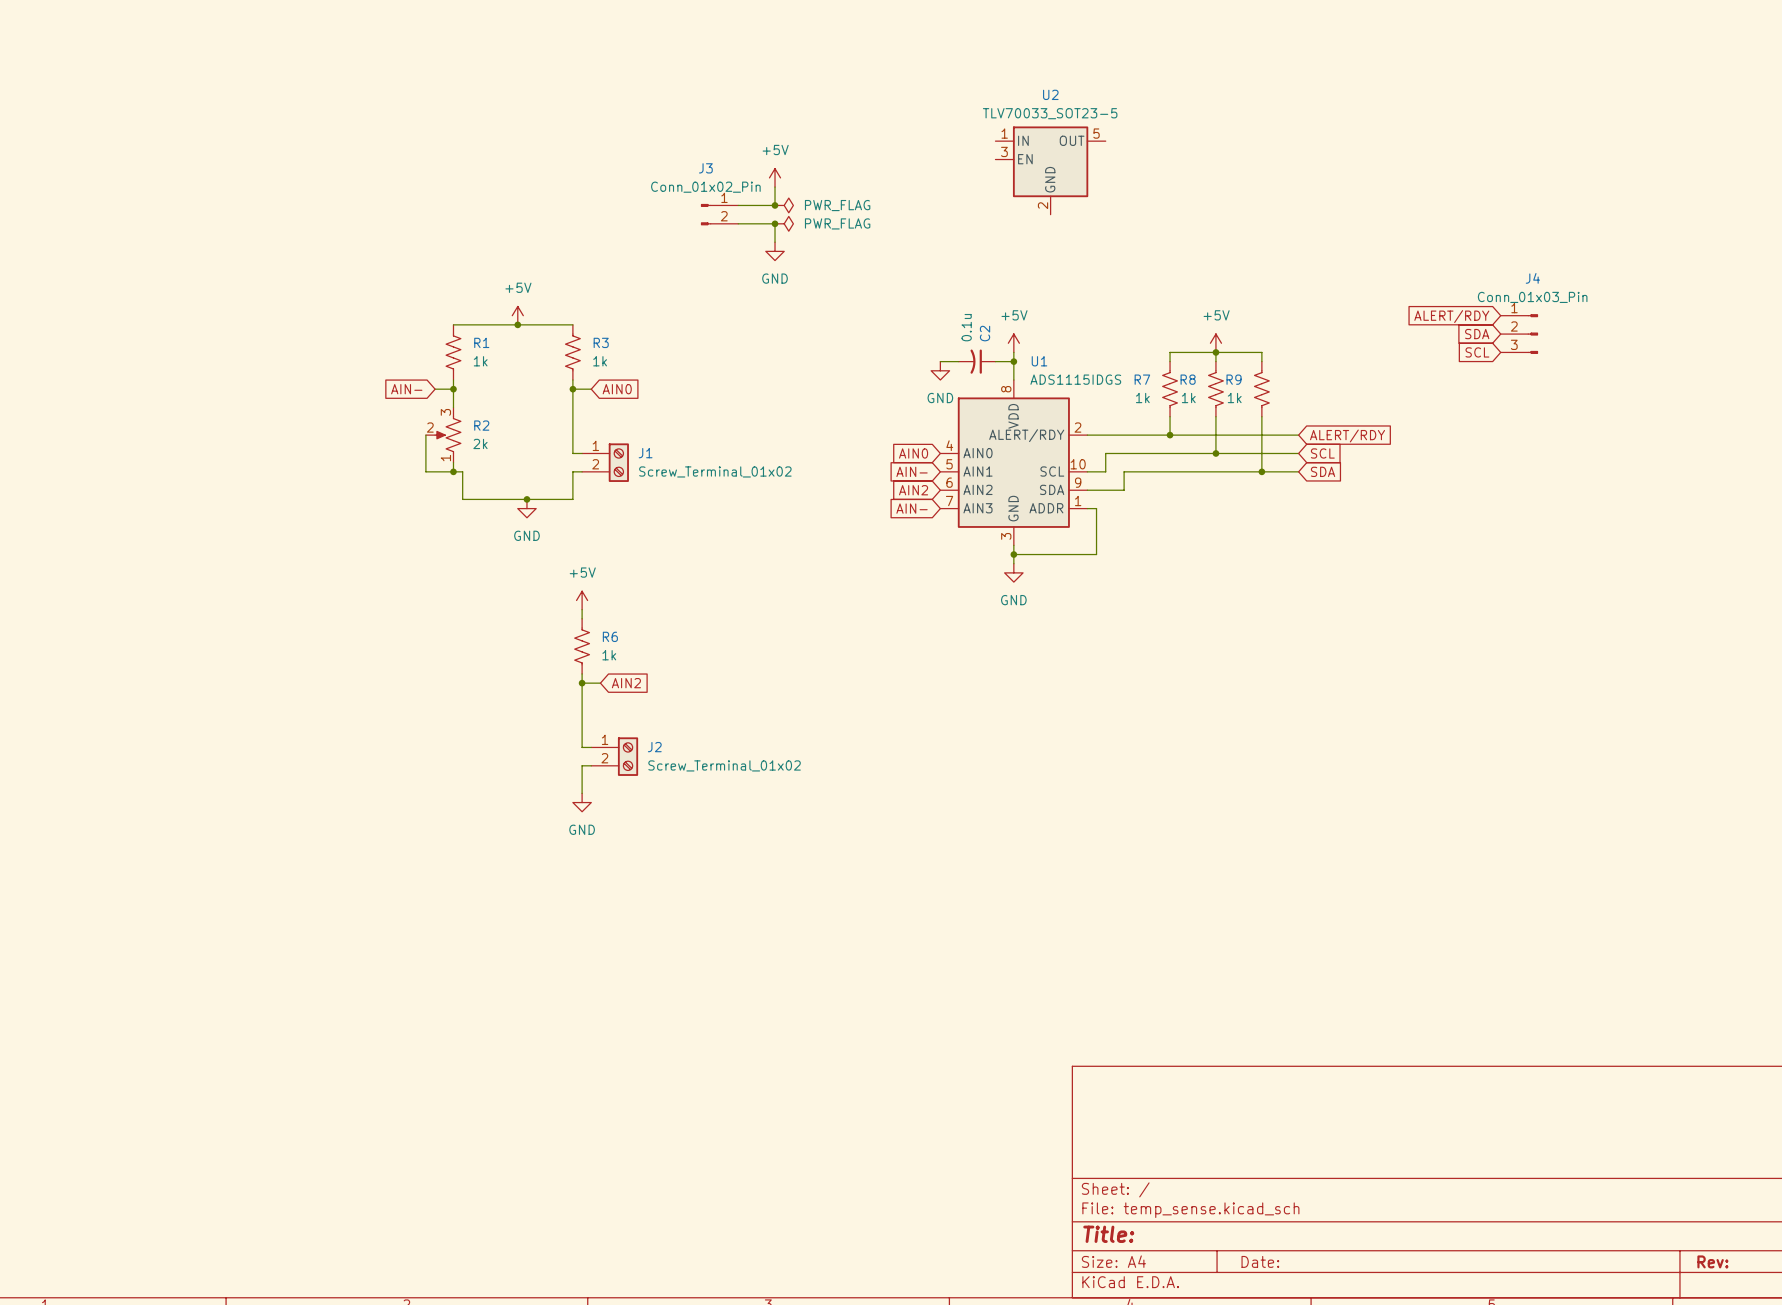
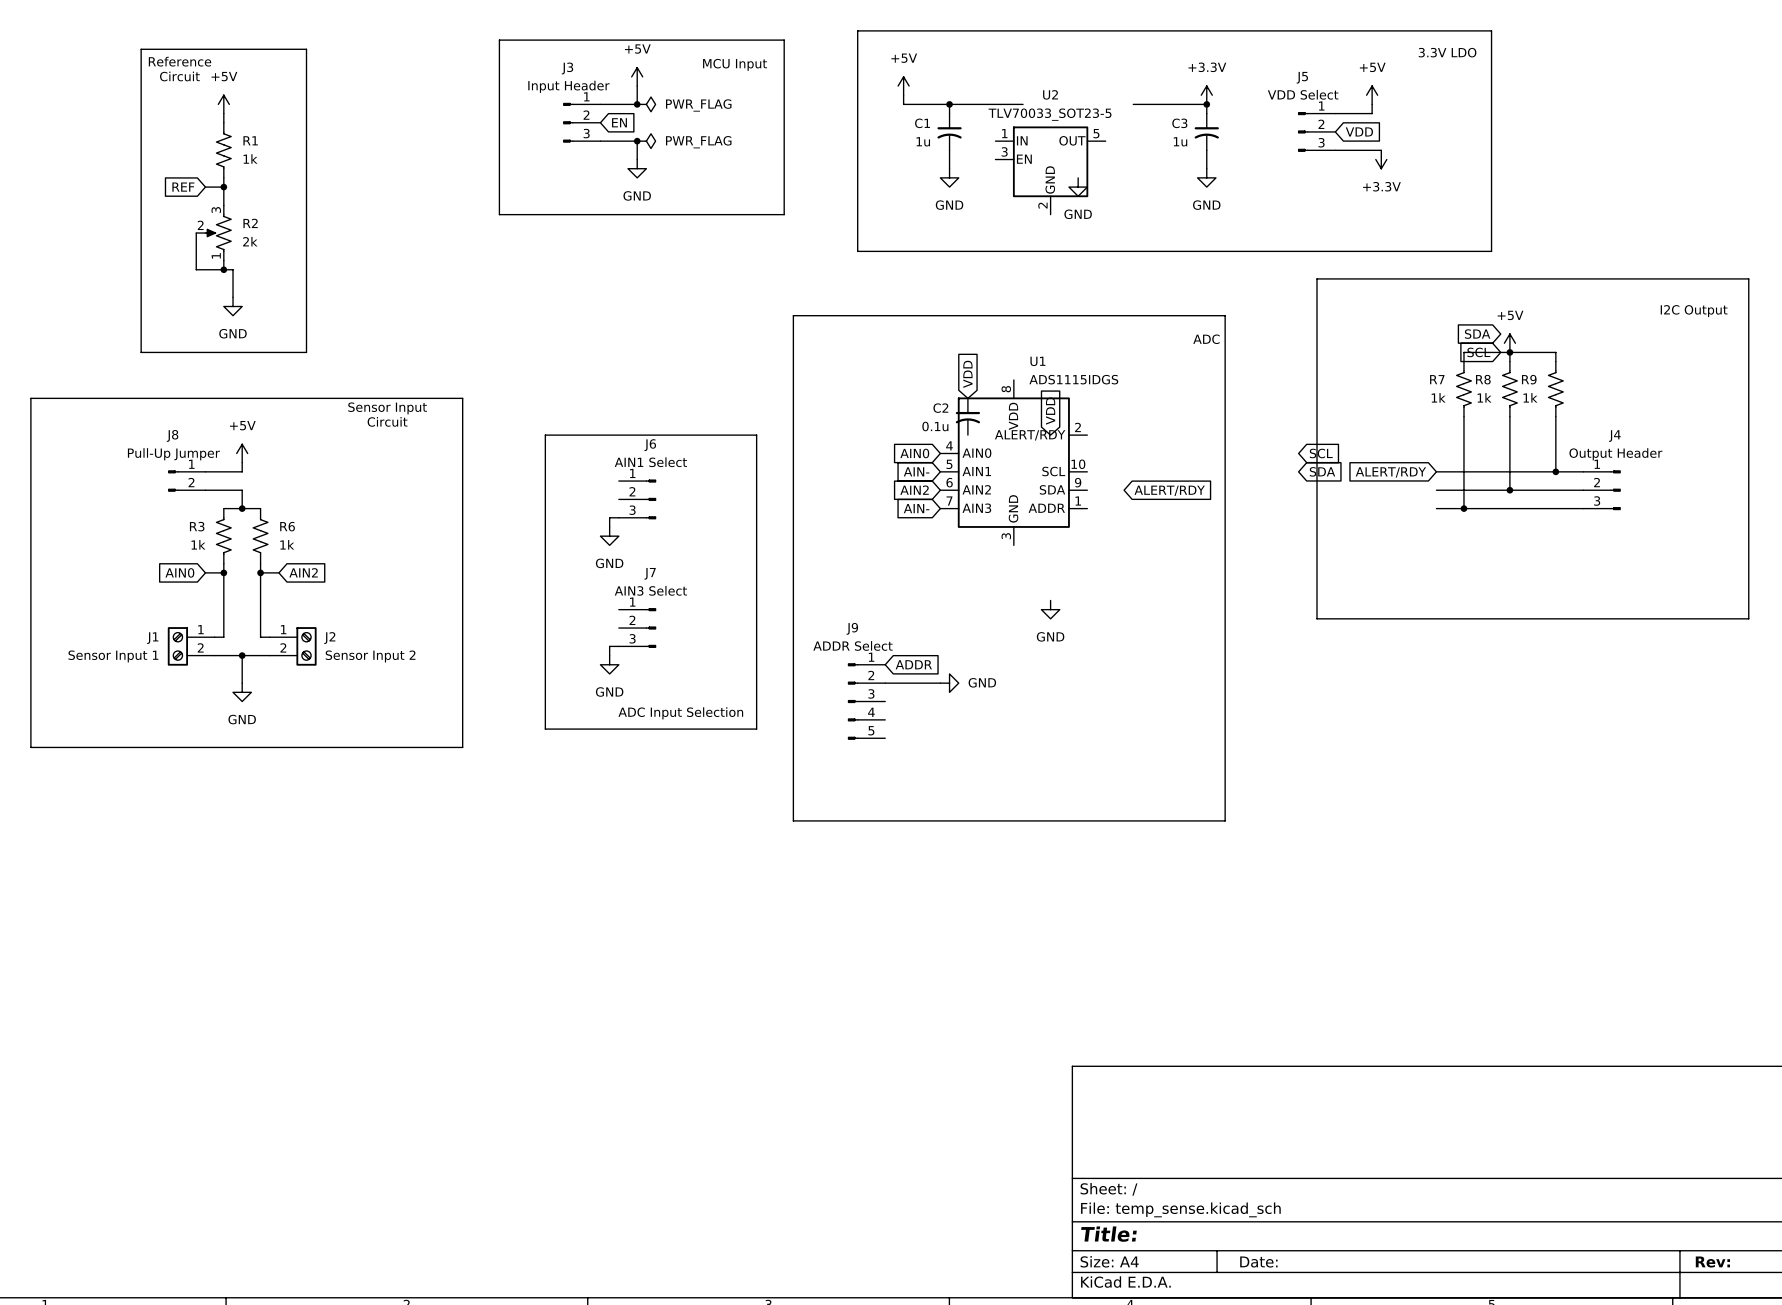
line: none -> (857, 30) (1491, 30) (1491, 251) (857, 251) (857, 30)
line: none -> (499, 40) (784, 40) (784, 214) (499, 214) (499, 40)
line: none -> (141, 49) (306, 49) (306, 352) (141, 352) (141, 49)
text: none -> 3.3V LDO (1447, 52)
text: none -> Reference (180, 61)
text: none -> MCU Input (735, 64)
text: none -> Circuit (179, 76)
power symbol: none -> +5V (637, 76)
power symbol: none -> +5V (903, 86)
wire: none -> (903, 95) (903, 104) (1023, 104)
power symbol: none -> +3.3V (1206, 95)
power symbol: none -> +5V (1372, 95)
power symbol: none -> +5V (223, 104)
junction: none -> (637, 104)
power symbol: none -> PWR_FLAG (646, 104)
wire: none -> (949, 104) (949, 113)
junction: none -> (949, 104)
wire: none -> (1133, 104) (1206, 104) (1206, 113)
junction: none -> (1206, 104)
wire: none -> (1372, 104) (1372, 113) (1335, 113)
wire: none -> (223, 113) (223, 122)
global label: none -> EN (619, 122)
C1: none -> 1u (949, 131)
C3: none -> 1u (1206, 131)
J5: none -> VDD Select (1316, 131)
global label: none -> VDD (1359, 131)
junction: none -> (637, 141)
power symbol: none -> PWR_FLAG (646, 141)
wire: none -> (949, 150) (949, 168)
wire: none -> (1206, 150) (1206, 168)
wire: none -> (1335, 150) (1381, 150)
power symbol: none -> +3.3V (1381, 159)
power symbol: none -> GND (637, 168)
wire: none -> (223, 177) (223, 205)
power symbol: +5V (775, 177) -> none
power symbol: none -> GND (949, 177)
power symbol: none -> GND (1206, 177)
global label: none -> REF (183, 187)
wire: none -> (205, 187) (223, 187)
junction: none -> (223, 187)
J3 value: Conn_01x02_Pin (705, 187) -> Input Header (568, 86)
wire: (775, 187) (775, 205) (738, 205) -> (637, 86) (637, 104) (600, 104)
power symbol: none -> GND (1078, 187)
J3 symbol: [700, 203, 739, 226] -> [563, 102, 601, 143]
junction: (775, 205) -> none
power symbol: PWR_FLAG (784, 205) -> none
wire: (738, 223) (775, 223) (775, 242) -> (600, 141) (637, 141) (637, 159)
junction: (775, 223) -> none
power symbol: PWR_FLAG (784, 223) -> none
wire: none -> (196, 233) (196, 269) (233, 269) (233, 297)
power symbol: GND (775, 251) -> none
wire: none -> (223, 260) (223, 269)
junction: none -> (223, 269)
line: none -> (1317, 278) (1748, 278) (1748, 618) (1317, 618) (1317, 278)
J4 value: Conn_01x03_Pin (1532, 297) -> Output Header (1615, 454)
power symbol: none -> GND (233, 306)
text: none -> I2C Output (1694, 311)
power symbol: +5V (517, 315) -> none
line: none -> (793, 315) (1225, 315) (1225, 820) (793, 820) (793, 315)
global label: ALERT/RDY (1451, 316) -> none
wire: (453, 324) (572, 324) -> none
junction: (517, 324) -> none
J4 position: (1519, 334) -> (1602, 490)
text: none -> ADC (1206, 339)
power symbol: +5V (1013, 343) -> none
power symbol: +5V (1215, 343) -> none
power symbol: none -> +5V (1509, 343)
R1 position: (453, 352) -> (223, 150)
R3 flip: as is (572, 352) -> left-right (223, 536)
R3 position: (572, 352) -> (223, 536)
wire: (1013, 352) (1013, 379) -> none
wire: (1215, 352) (1215, 361) -> none
junction: (1215, 352) -> none
wire: none -> (1509, 352) (1509, 361)
junction: none -> (1509, 352)
wire: (940, 361) (958, 361) -> none
C2 rotation: 0° (976, 361) -> 90° counterclockwise (967, 417)
C2 position: (977, 361) -> (967, 416)
wire: (995, 361) (1013, 361) -> none
junction: (1013, 361) -> none
wire: (1170, 361) (1170, 352) (1261, 352) (1261, 361) -> none
wire: none -> (1463, 361) (1463, 352) (1555, 352) (1555, 361)
power symbol: GND (940, 370) -> none
global label: none -> VDD (967, 374)
wire: (453, 379) (453, 407) -> none
wire: (572, 379) (572, 453) (582, 453) -> none
global label: AIN- (406, 389) -> none
wire: (435, 389) (453, 389) -> none
junction: (453, 389) -> none
wire: (572, 389) (591, 389) -> none
junction: (572, 389) -> none
global label: AIN0 (617, 389) -> none
R7 position: (1170, 389) -> (1463, 389)
R8 position: (1215, 389) -> (1509, 389)
R9 position: (1261, 389) -> (1555, 389)
line: none -> (30, 398) (462, 398) (462, 747) (30, 747) (30, 398)
text: none -> Sensor Input (387, 408)
global label: none -> VDD (1050, 411)
wire: (1170, 416) (1170, 435) -> none
wire: (1215, 416) (1215, 453) -> none
wire: (1261, 416) (1261, 471) -> none
wire: none -> (1463, 416) (1463, 508)
wire: none -> (1509, 416) (1509, 490)
wire: none -> (1555, 416) (1555, 471)
text: none -> Circuit (387, 421)
wire: (425, 435) (425, 471) (462, 471) (462, 499) (572, 499) (572, 471) (582, 471) -> none
R2 position: (443, 435) -> (213, 233)
line: none -> (545, 435) (756, 435) (756, 729) (545, 729) (545, 435)
wire: (1087, 435) (1298, 435) -> none
junction: (1170, 435) -> none
global label: ALERT/RDY (1347, 435) -> none
power symbol: none -> +5V (242, 453)
junction: (1215, 453) -> none
wire: (1298, 453) (1105, 453) (1105, 471) (1087, 471) -> none
wire: none -> (242, 462) (242, 471) (205, 471)
wire: (453, 462) (453, 471) -> none
J1 position: (605, 462) -> (191, 646)
J1 flip: as is (618, 462) -> left-right (177, 646)
junction: (453, 471) -> none
J1 value: Screw_Terminal_01x02 (715, 471) -> Sensor Input 1 (113, 656)
junction: (1261, 471) -> none
wire: (1298, 471) (1124, 471) (1124, 490) (1087, 490) -> none
wire: none -> (1436, 471) (1583, 471)
junction: none -> (1555, 471)
global label: none -> ALERT/RDY (1390, 472)
J8: none -> Pull-Up Jumper (186, 481)
wire: none -> (205, 490) (242, 490) (242, 508)
wire: none -> (1436, 490) (1583, 490)
junction: none -> (1509, 490)
global label: none -> ALERT/RDY (1169, 490)
junction: (526, 499) -> none
J6: none -> AIN1 Select (637, 499)
wire: none -> (223, 508) (260, 508)
junction: none -> (242, 508)
power symbol position: GND (526, 508) -> GND (609, 536)
wire: (1087, 508) (1096, 508) (1096, 554) (1013, 554) -> none
wire: none -> (1436, 508) (1583, 508)
junction: none -> (1463, 508)
wire: none -> (618, 517) (609, 517) (609, 526)
wire: (1013, 545) (1013, 563) -> none
junction: (1013, 554) -> none
wire: none -> (223, 563) (223, 637) (214, 637)
wire: none -> (260, 563) (260, 637) (269, 637)
global label: none -> AIN0 (179, 572)
wire: none -> (205, 572) (223, 572)
junction: none -> (223, 572)
wire: none -> (260, 572) (278, 572)
junction: none -> (260, 572)
global label: none -> AIN2 (303, 572)
power symbol position: GND (1013, 572) -> GND (1050, 609)
power symbol: +5V (582, 600) -> none
wire: (582, 609) (582, 618) -> none
J7: none -> AIN3 Select (637, 628)
R6 position: (582, 646) -> (260, 536)
wire: none -> (618, 646) (609, 646) (609, 655)
wire: none -> (214, 655) (269, 655)
wire: none -> (242, 655) (242, 683)
junction: none -> (242, 655)
power symbol: none -> GND (609, 664)
global label: none -> ADDR (913, 664)
wire: (582, 673) (582, 747) (591, 747) -> none
wire: (582, 683) (600, 683) -> none
junction: (582, 683) -> none
global label: AIN2 (626, 683) -> none
wire: none -> (885, 683) (940, 683)
power symbol: none -> GND (949, 683)
power symbol: none -> GND (242, 692)
J9: none -> ADDR Select (866, 701)
text: none -> ADC Input Selection (680, 713)
J2 position: (614, 756) -> (293, 646)
wire: (591, 765) (582, 765) (582, 793) -> none
J2 value: Screw_Terminal_01x02 (724, 765) -> Sensor Input 2 (370, 656)
power symbol: GND (582, 802) -> none

